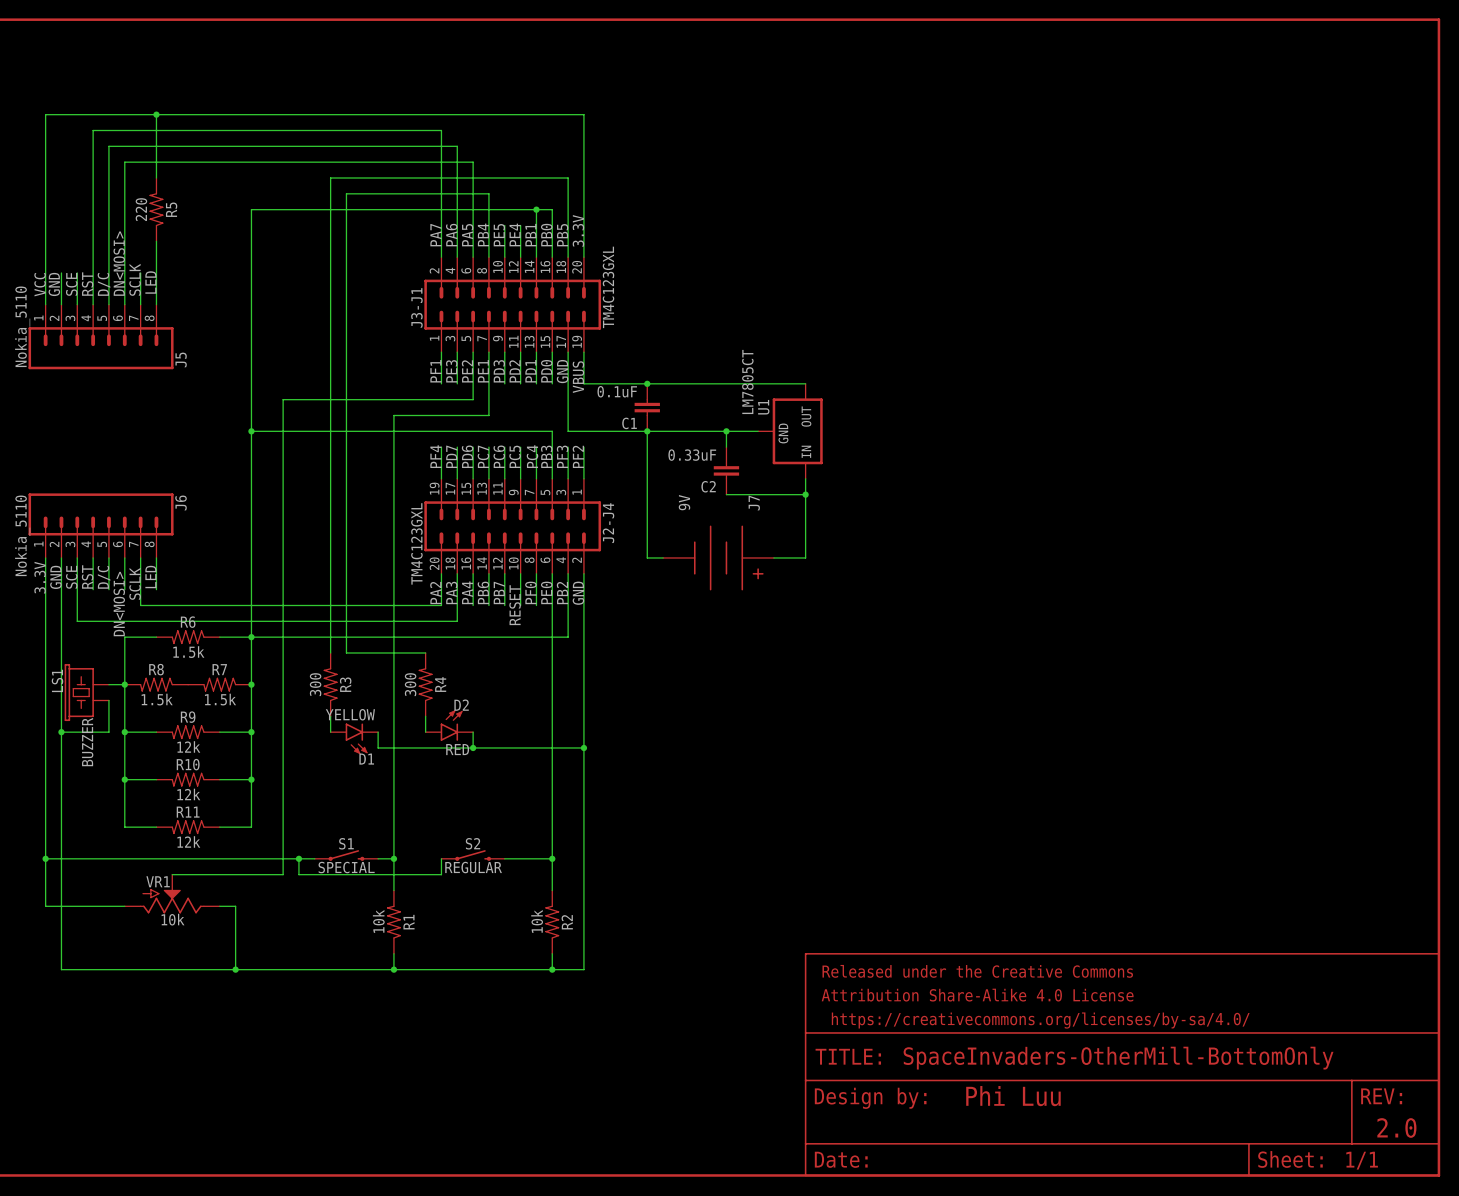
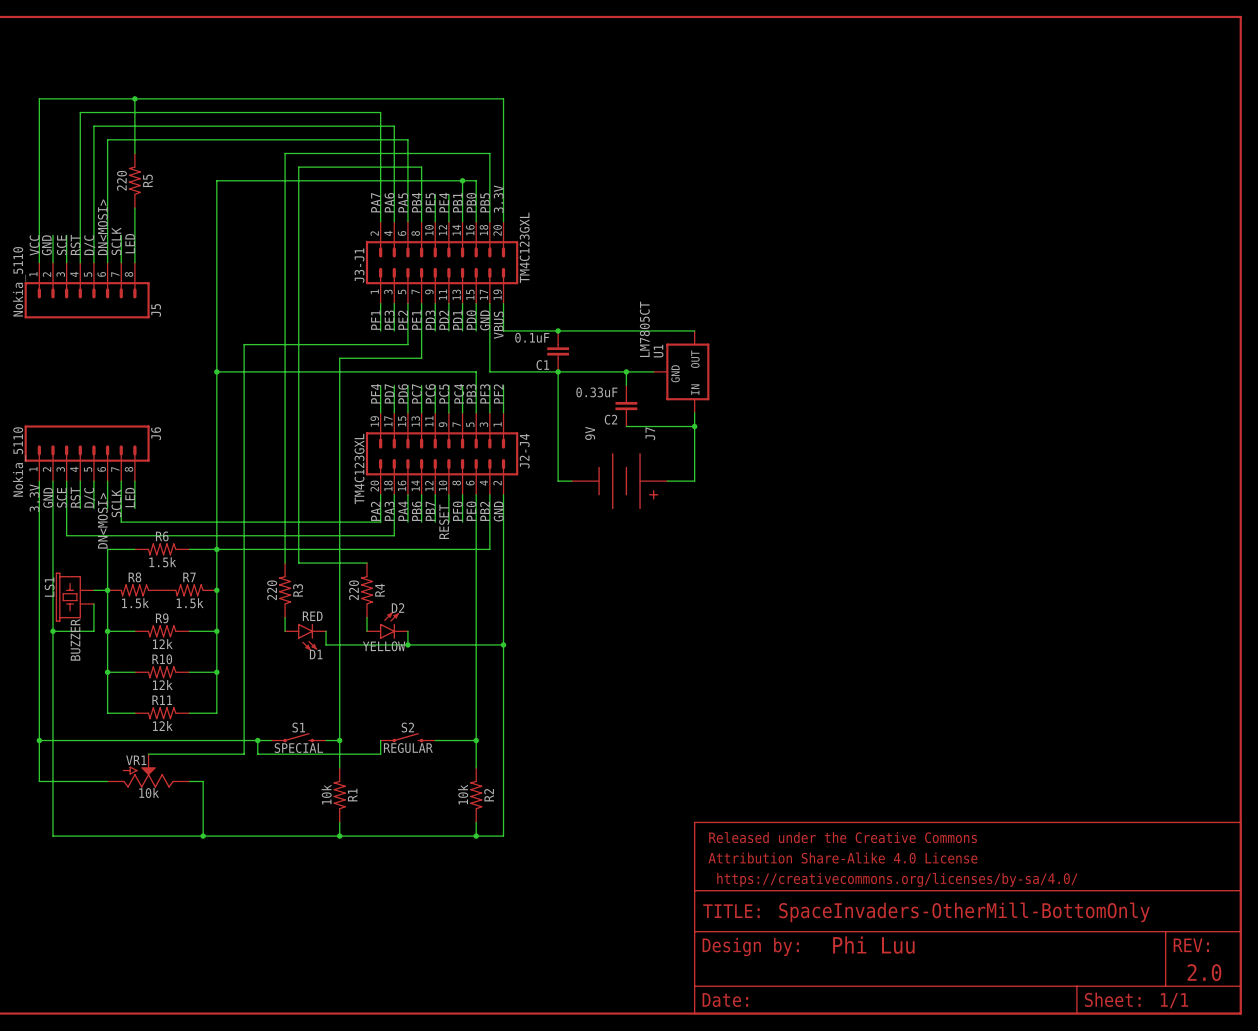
R3 value: 300 (315, 684) -> 220 (272, 590)
R4 value: 300 (410, 684) -> 220 (354, 590)
D1 value: YELLOW (350, 714) -> RED (312, 616)
D2 value: RED (457, 749) -> YELLOW (384, 646)

